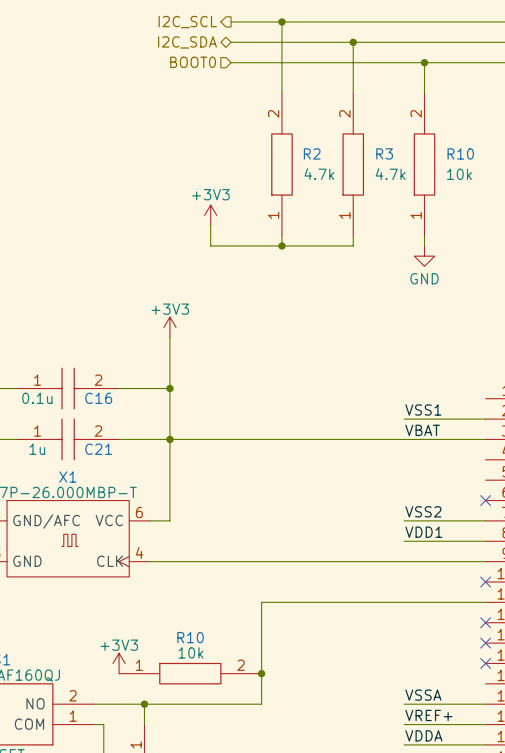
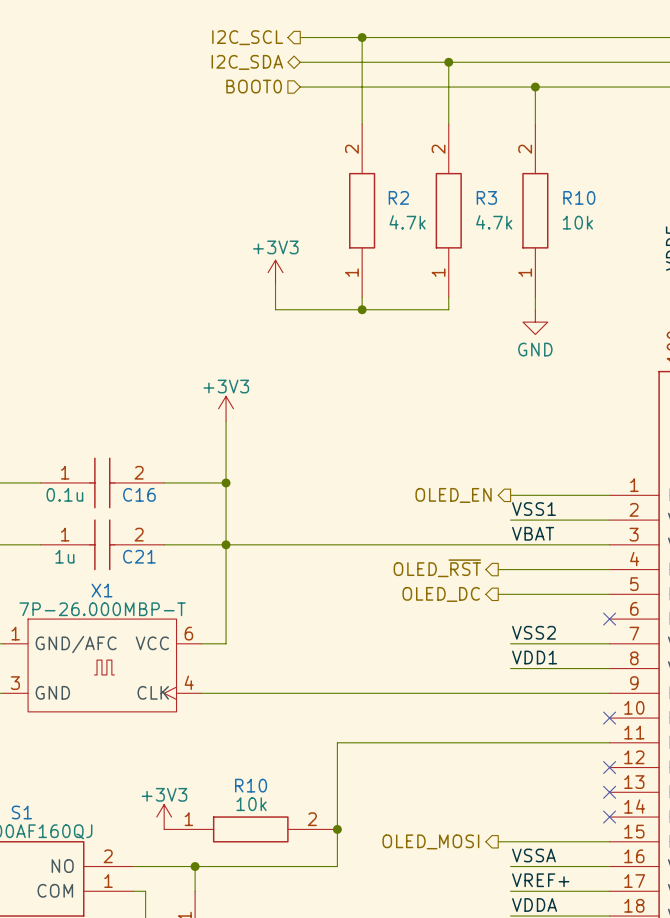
hierarchical label: none -> OLED_EN (453, 495)
wire: none -> (510, 495) (609, 495)
hierarchical label: none -> OLED_~{RST} (437, 568)
wire: none -> (498, 569) (609, 569)
hierarchical label: none -> OLED_DC (441, 594)
wire: none -> (498, 594) (609, 594)
hierarchical label: none -> OLED_MOSI (430, 841)
wire: none -> (498, 841) (609, 841)

